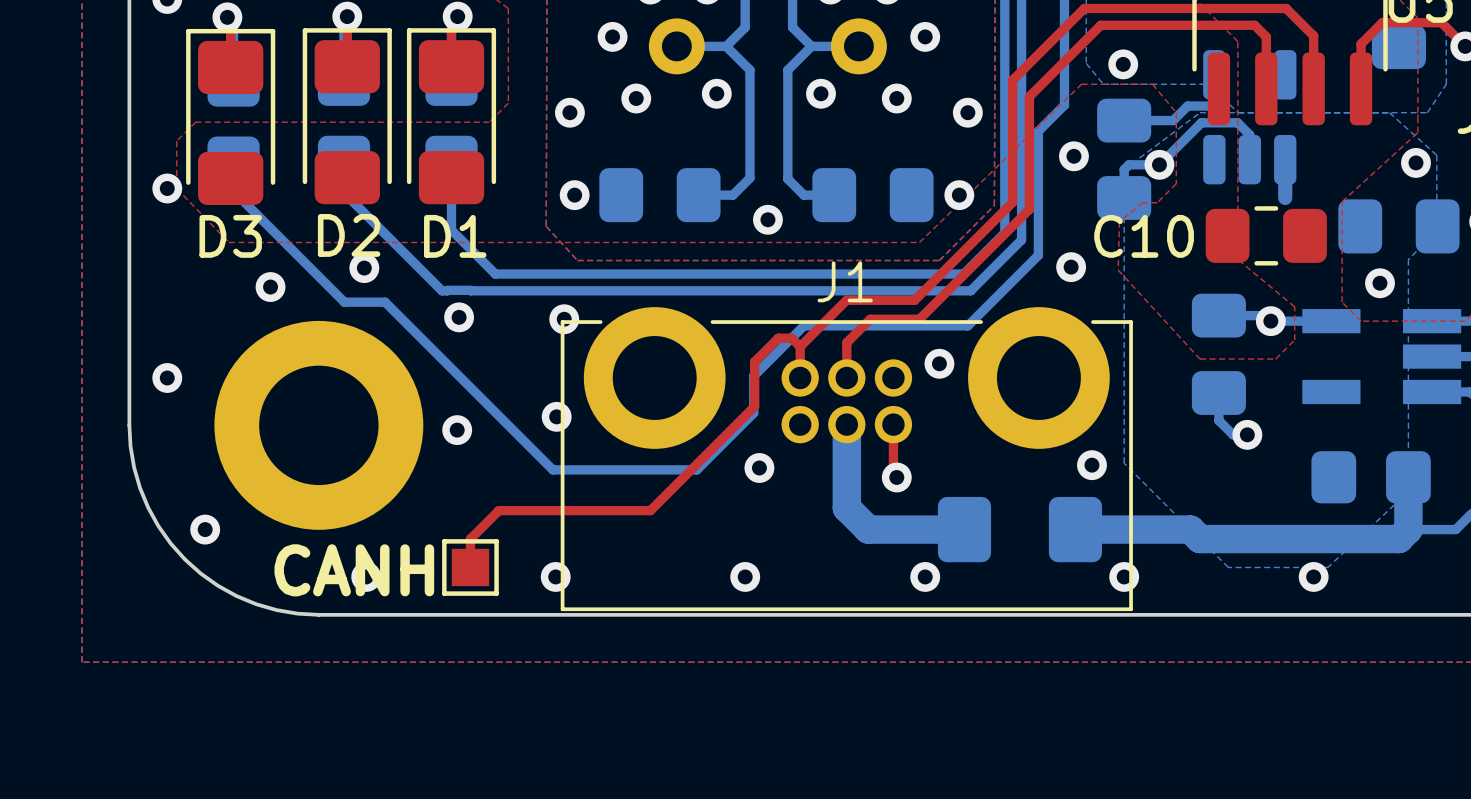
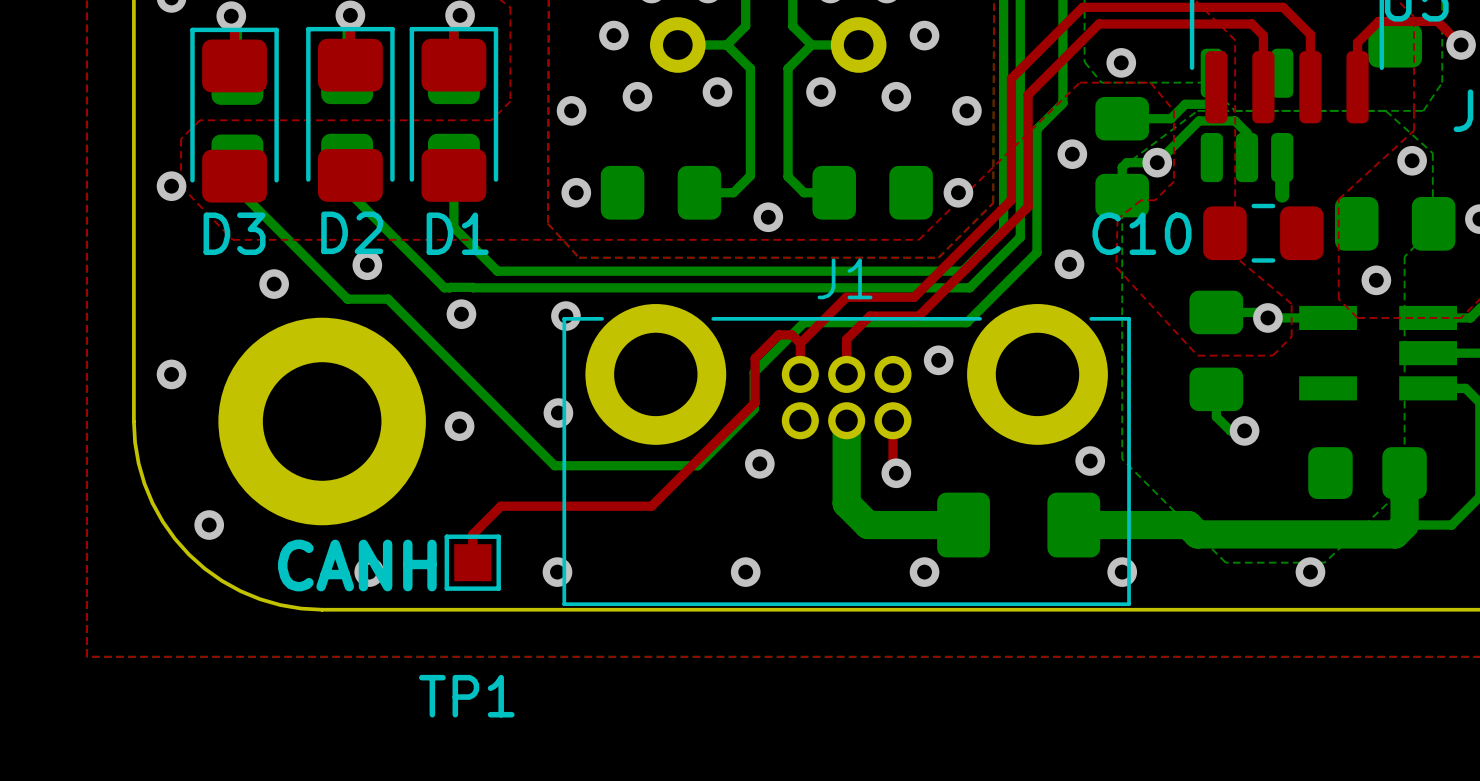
TP1 name: none -> TP1 (466, 696)

